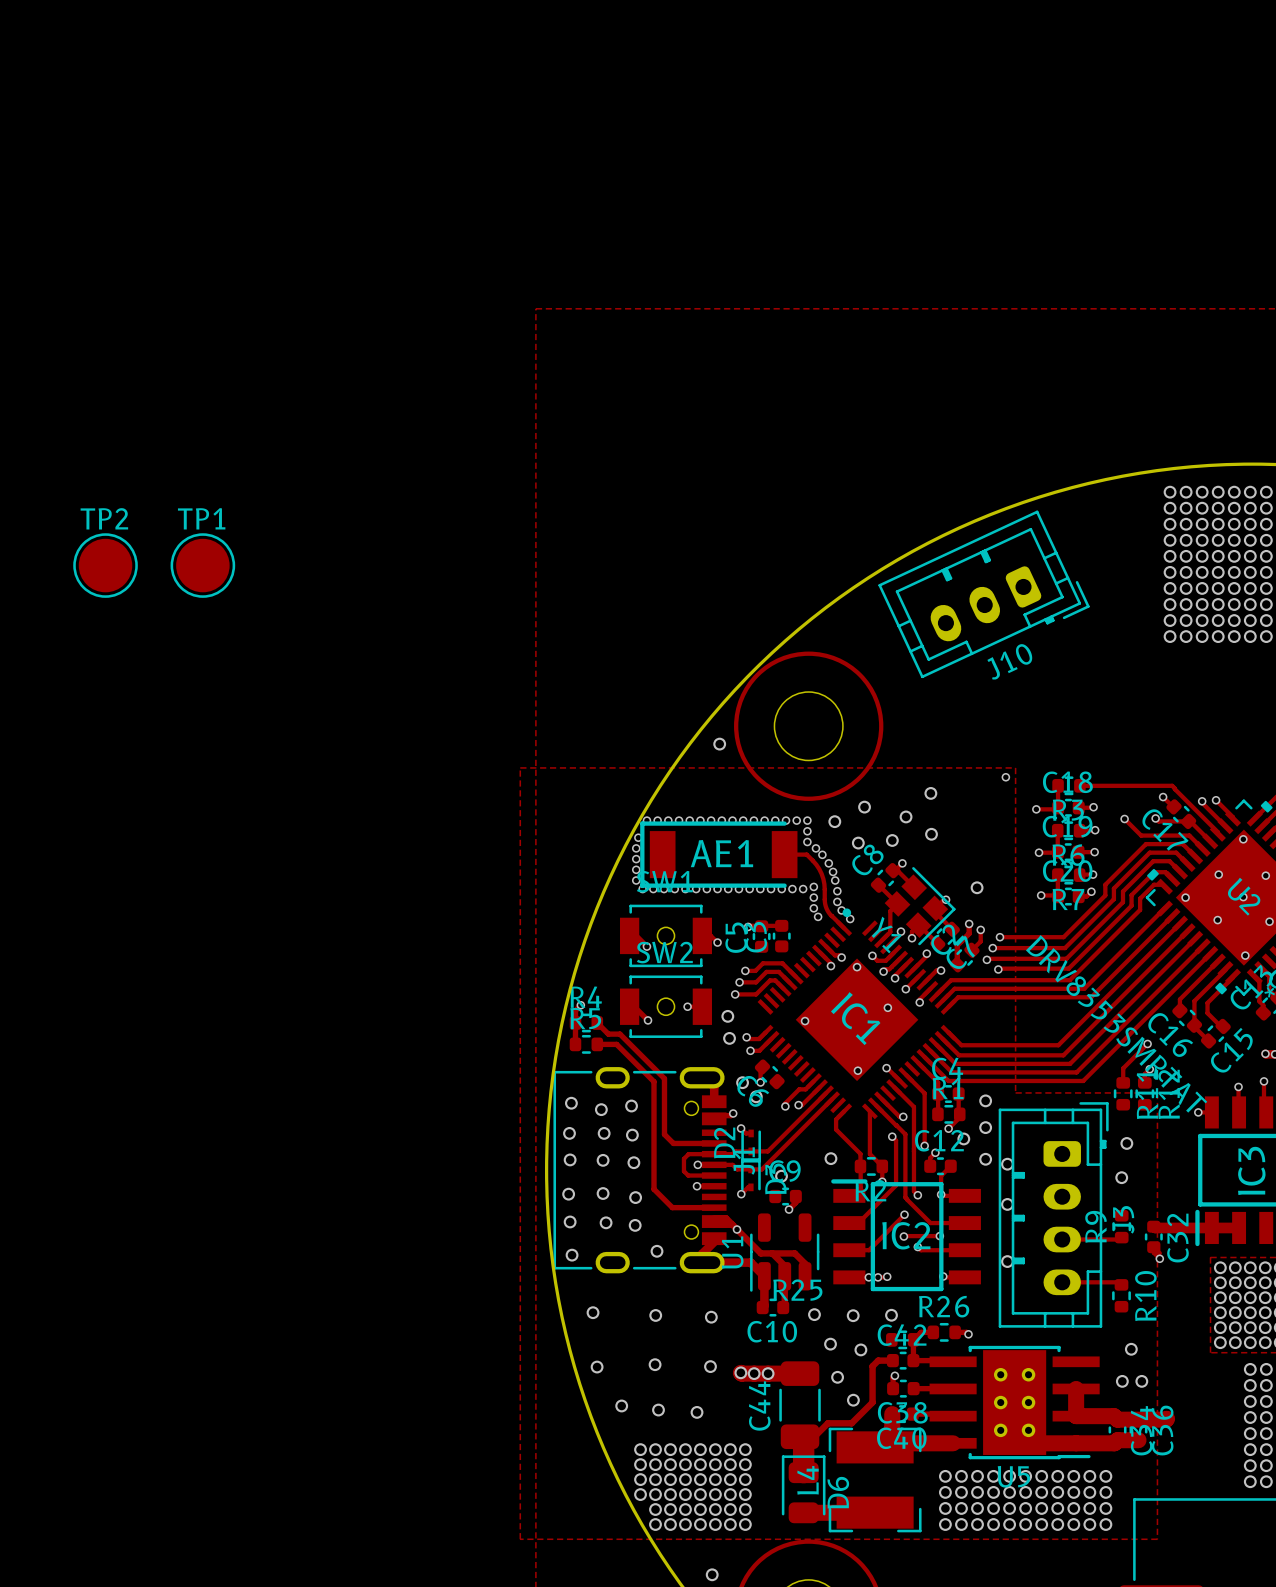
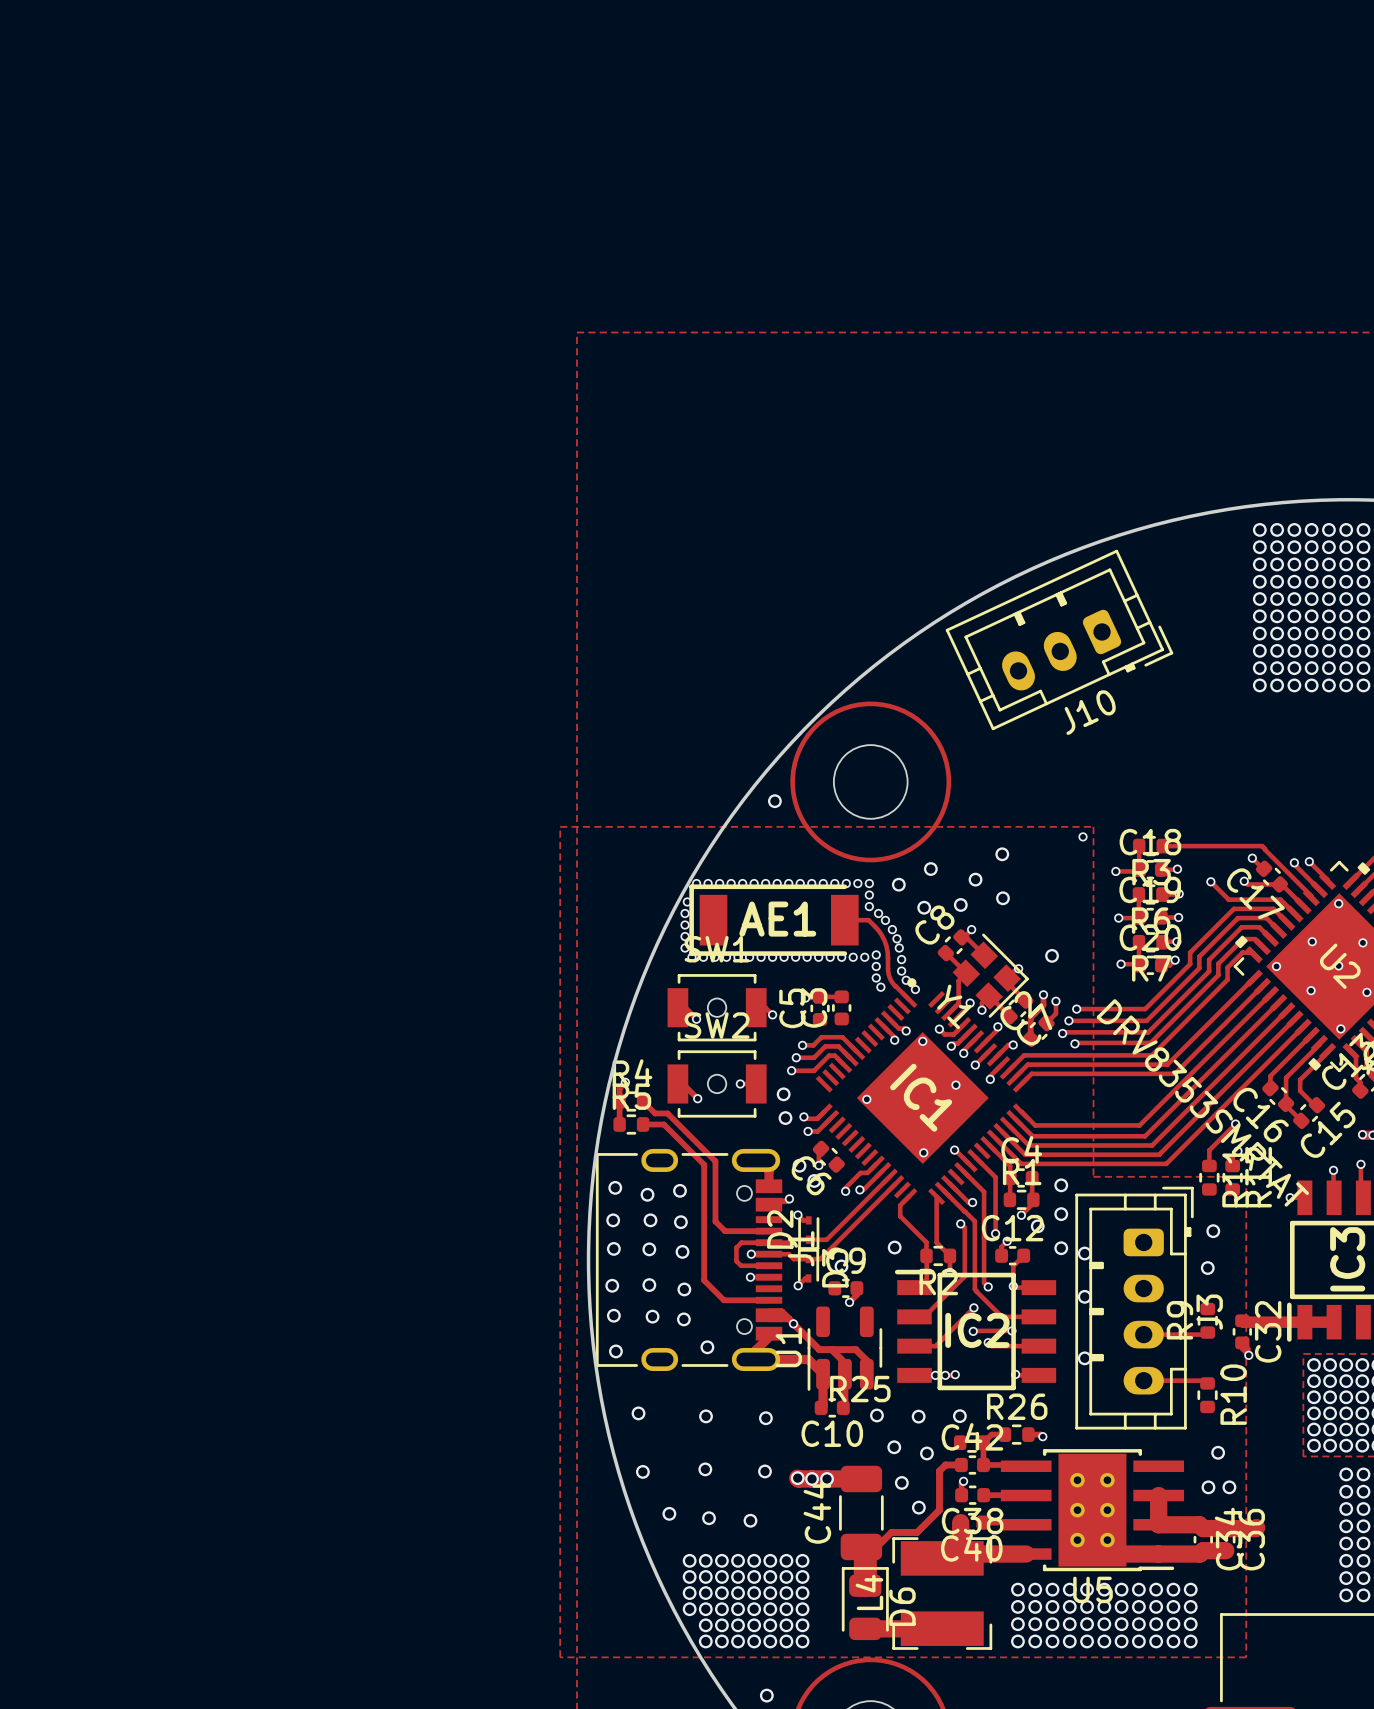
TP2: (105, 565) -> none
TP1: (202, 565) -> none

